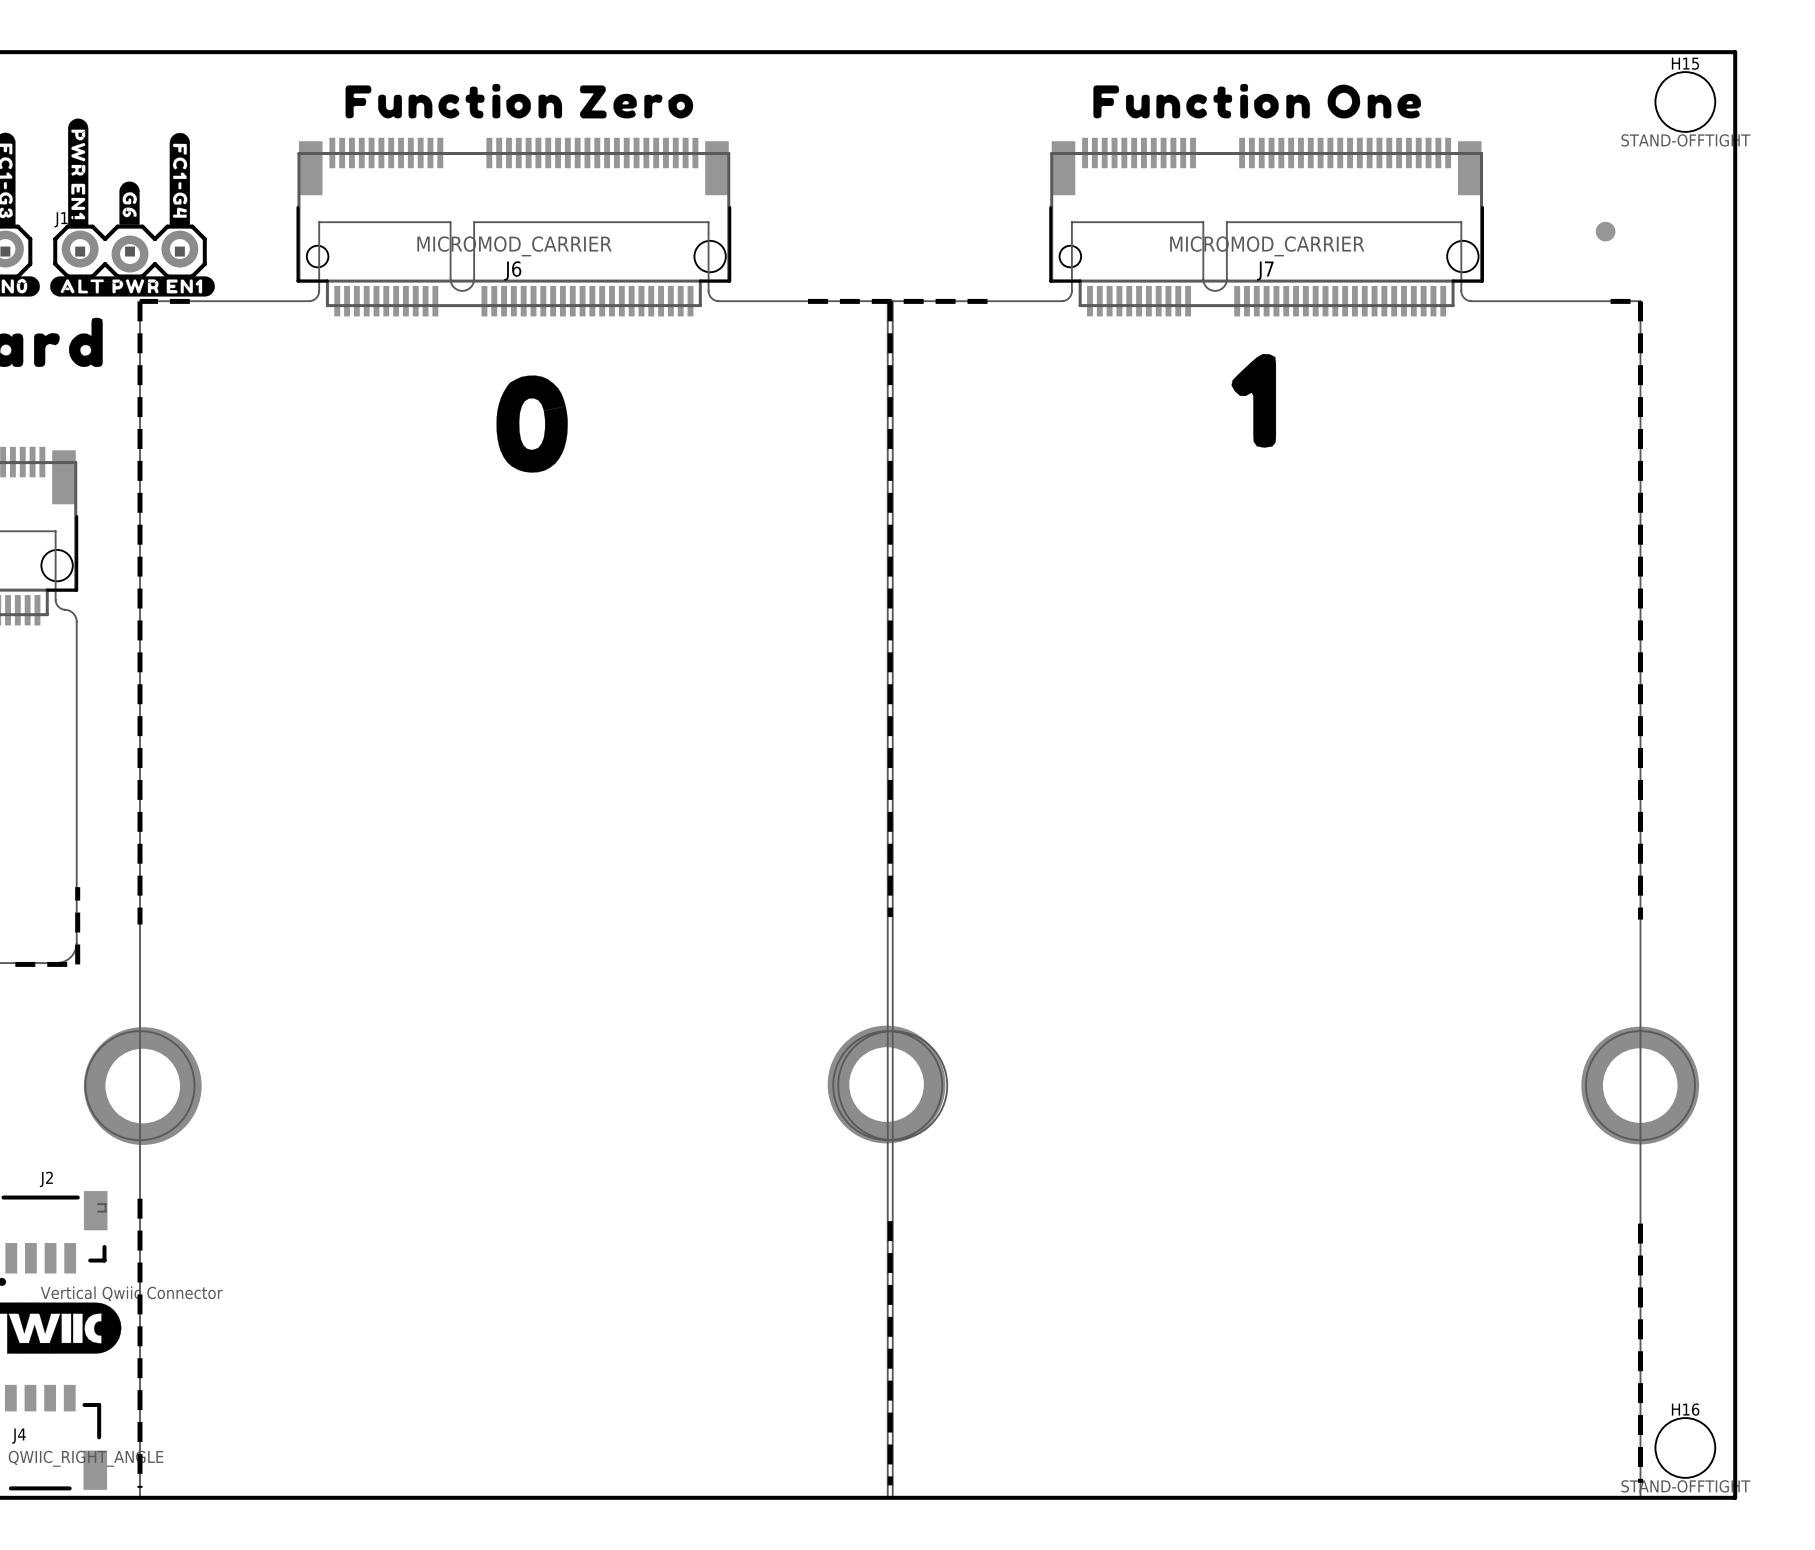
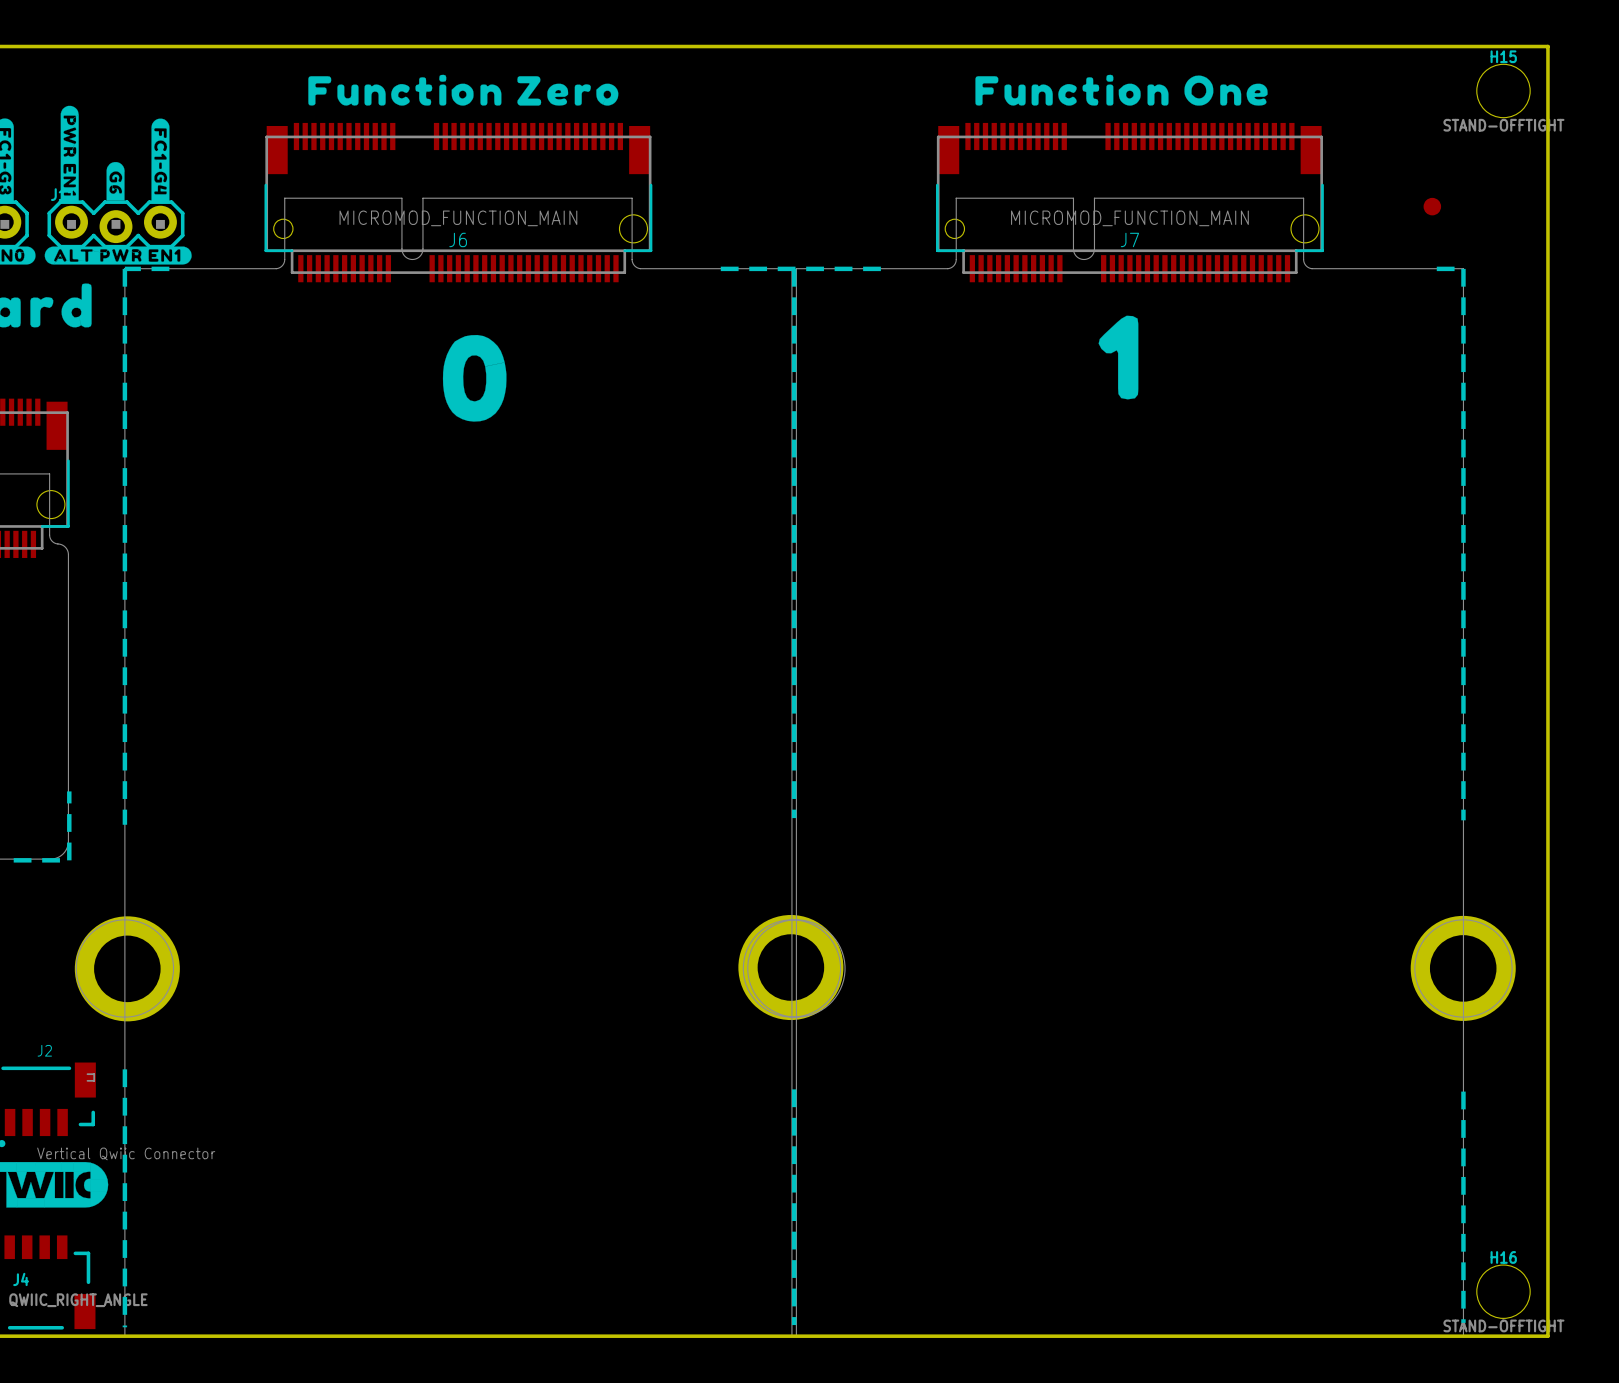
J6 value: MICROMOD_CARRIER (514, 246) -> MICROMOD_FUNCTION_MAIN (458, 218)
J7 value: MICROMOD_CARRIER (1267, 246) -> MICROMOD_FUNCTION_MAIN (1129, 218)

